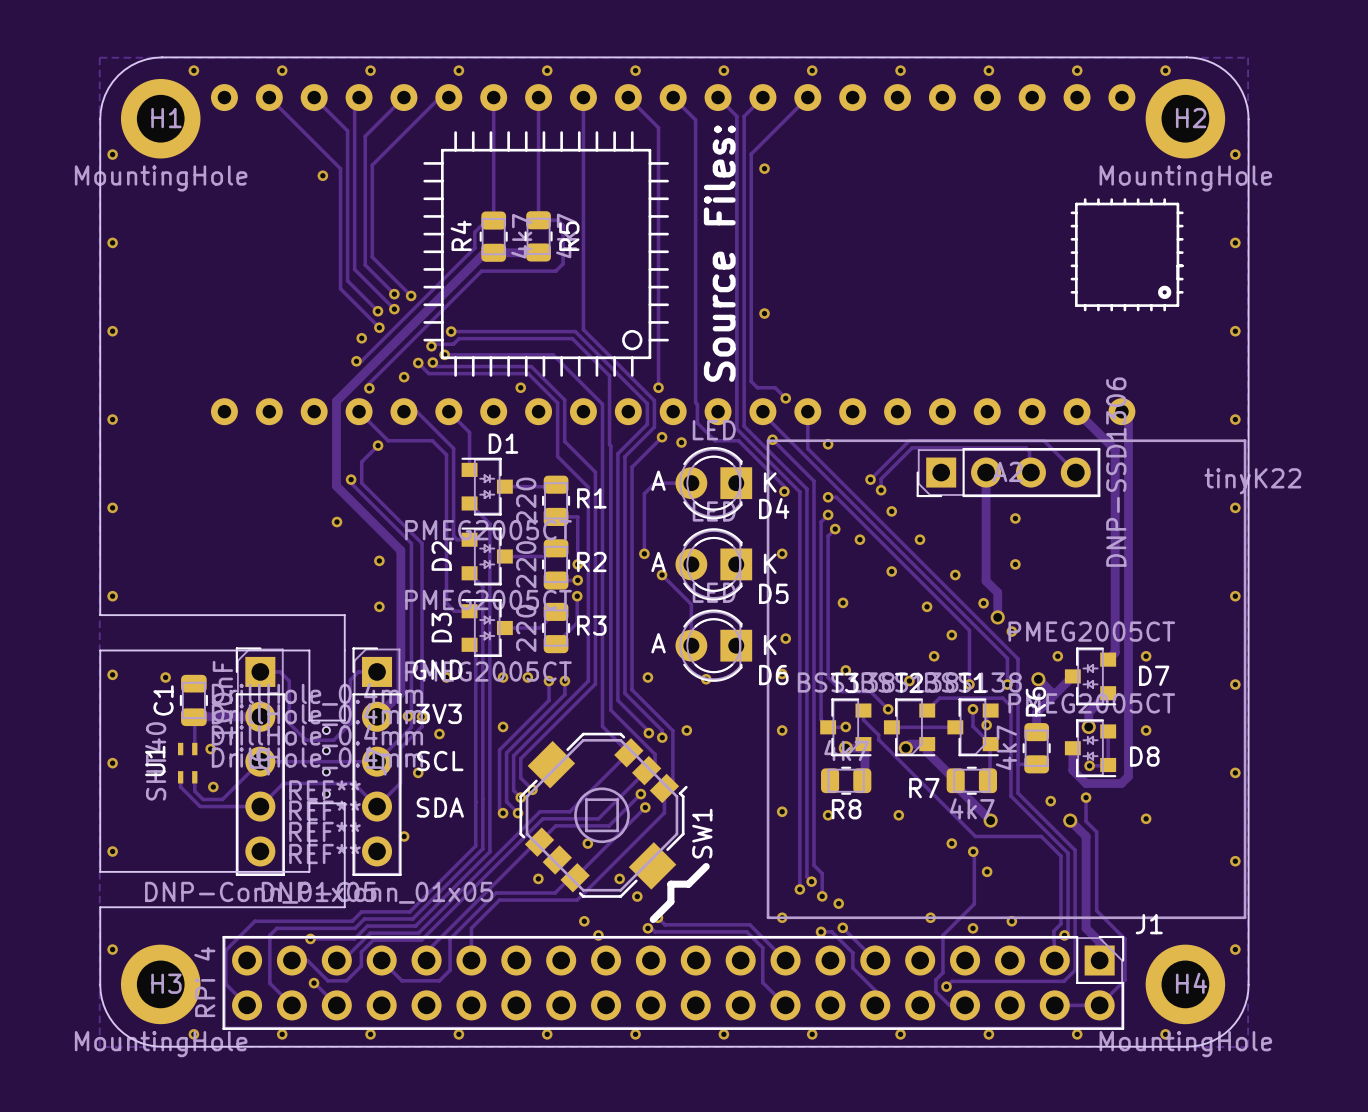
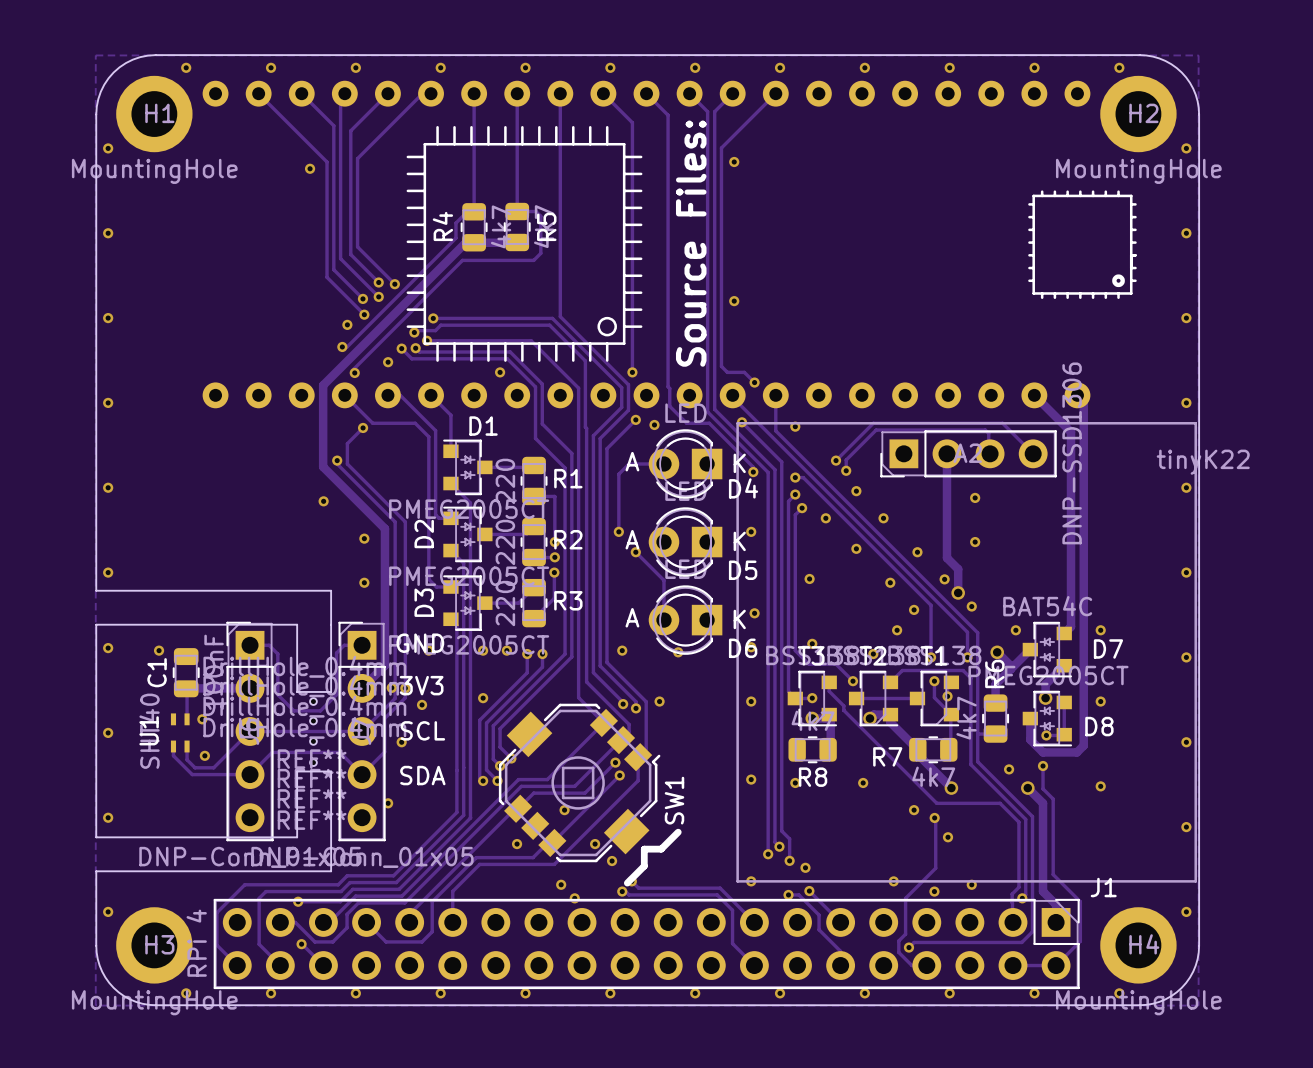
D7 value: PMEG2005CT (1091, 631) -> BAT54C (1047, 606)

